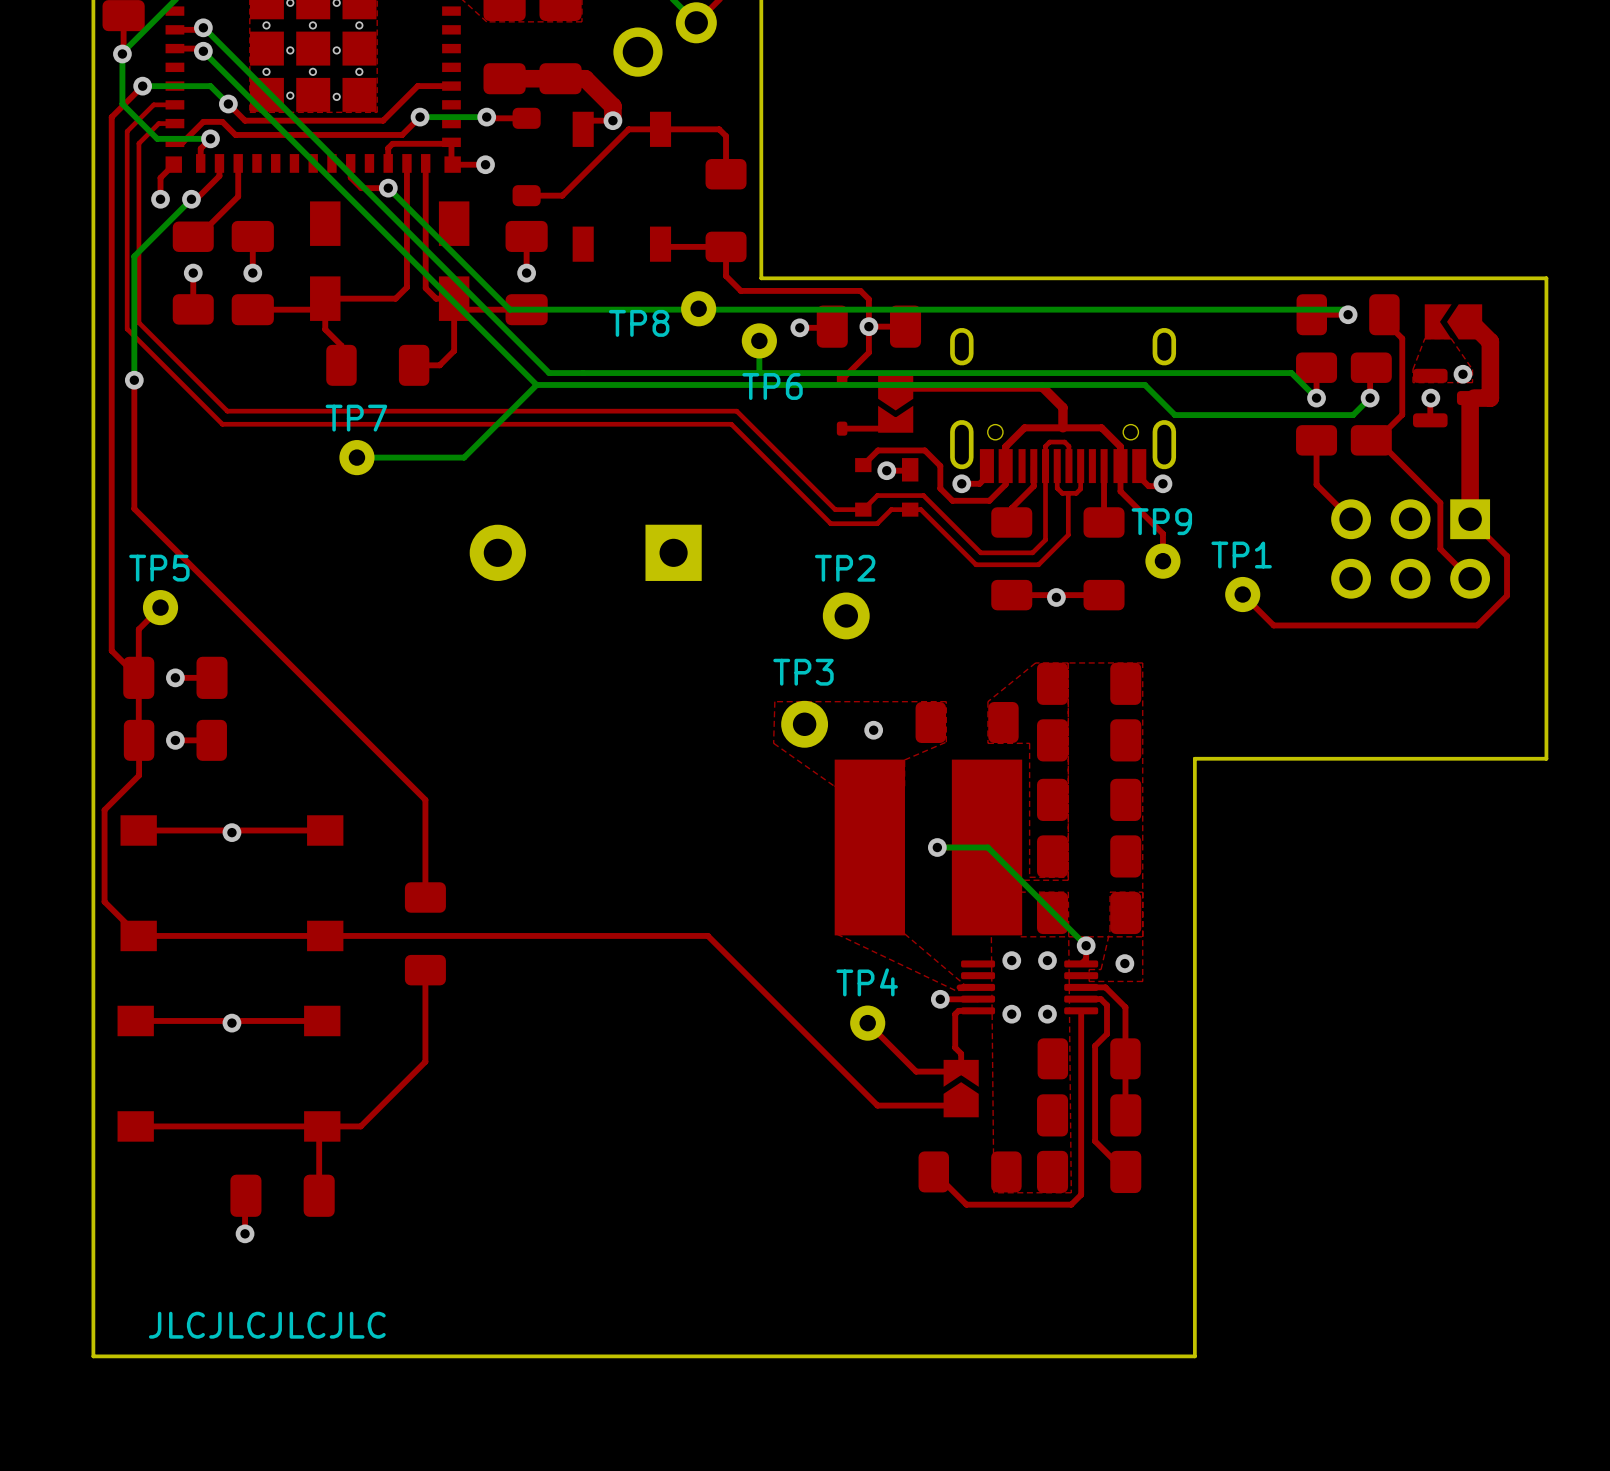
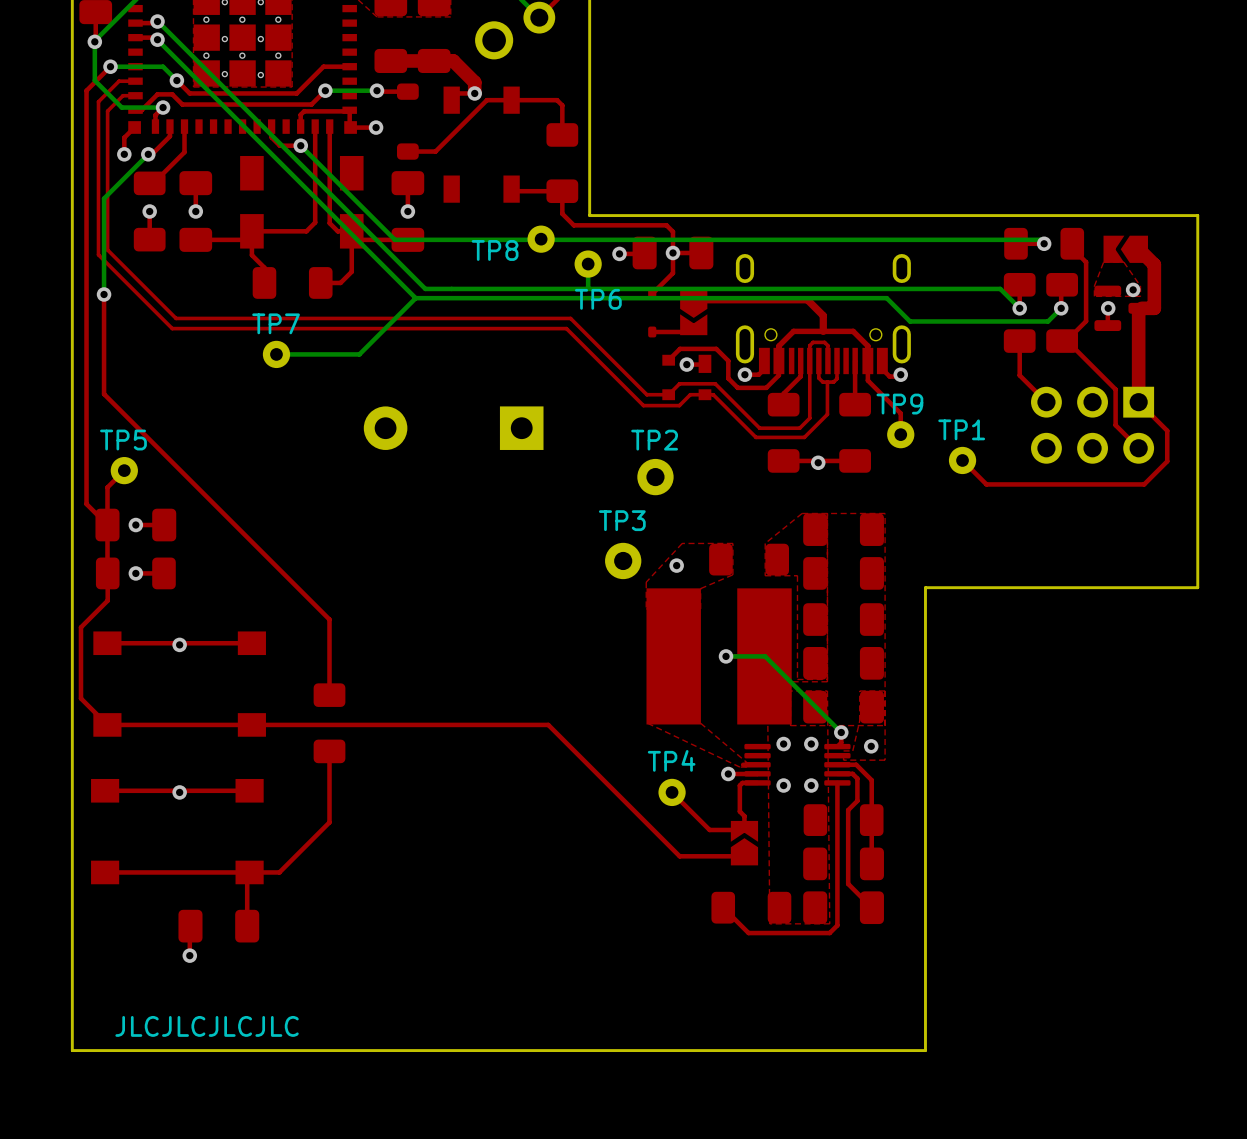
top zone outline: (880, 701) (774, 701) (773, 743) (834, 786) -> (682, 543) (646, 582) (646, 608)

